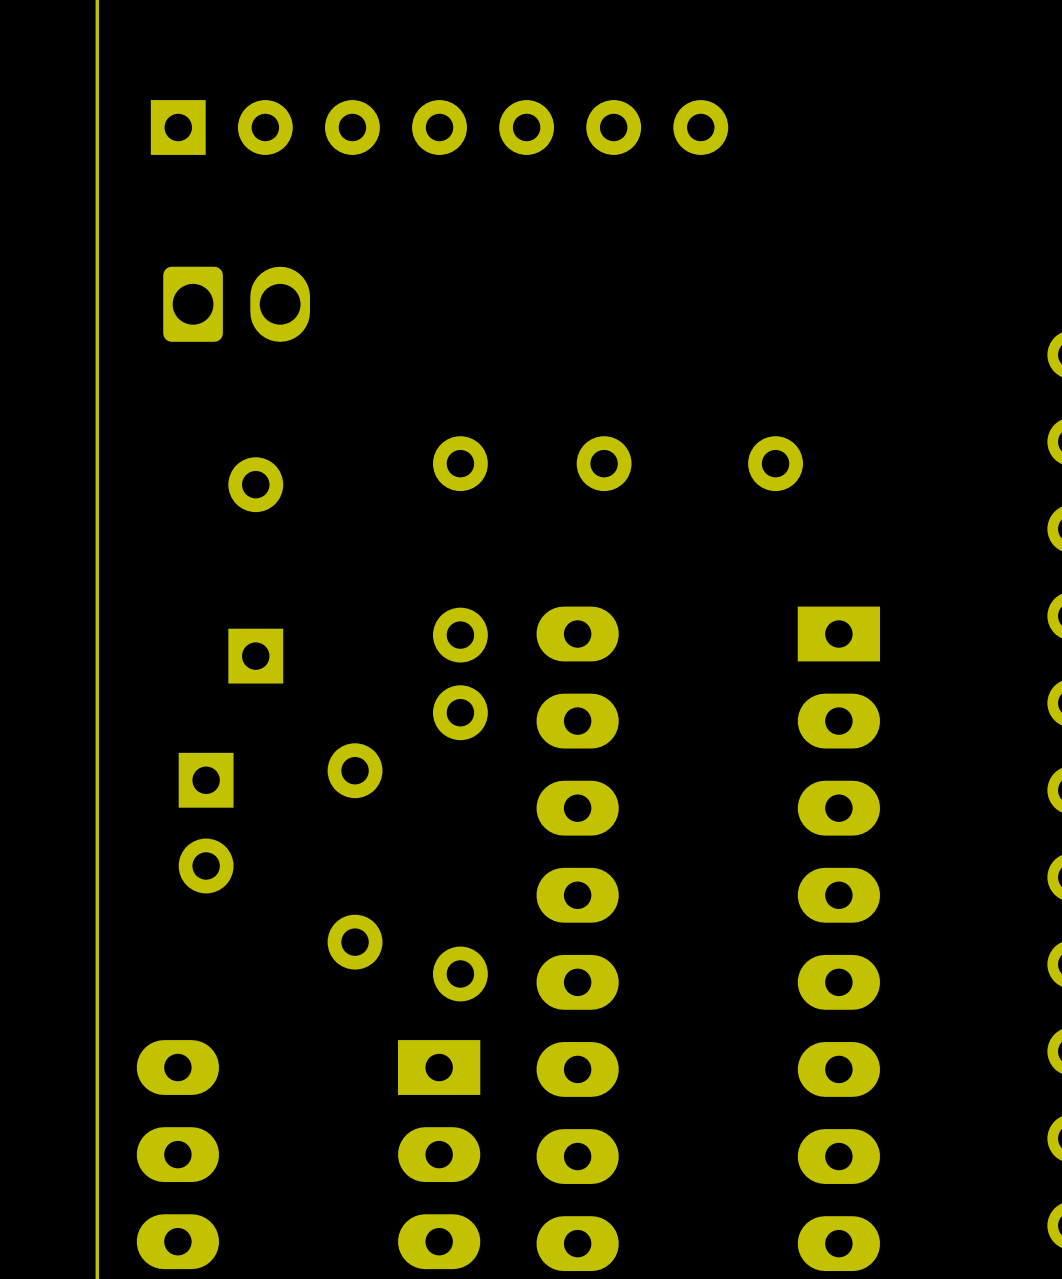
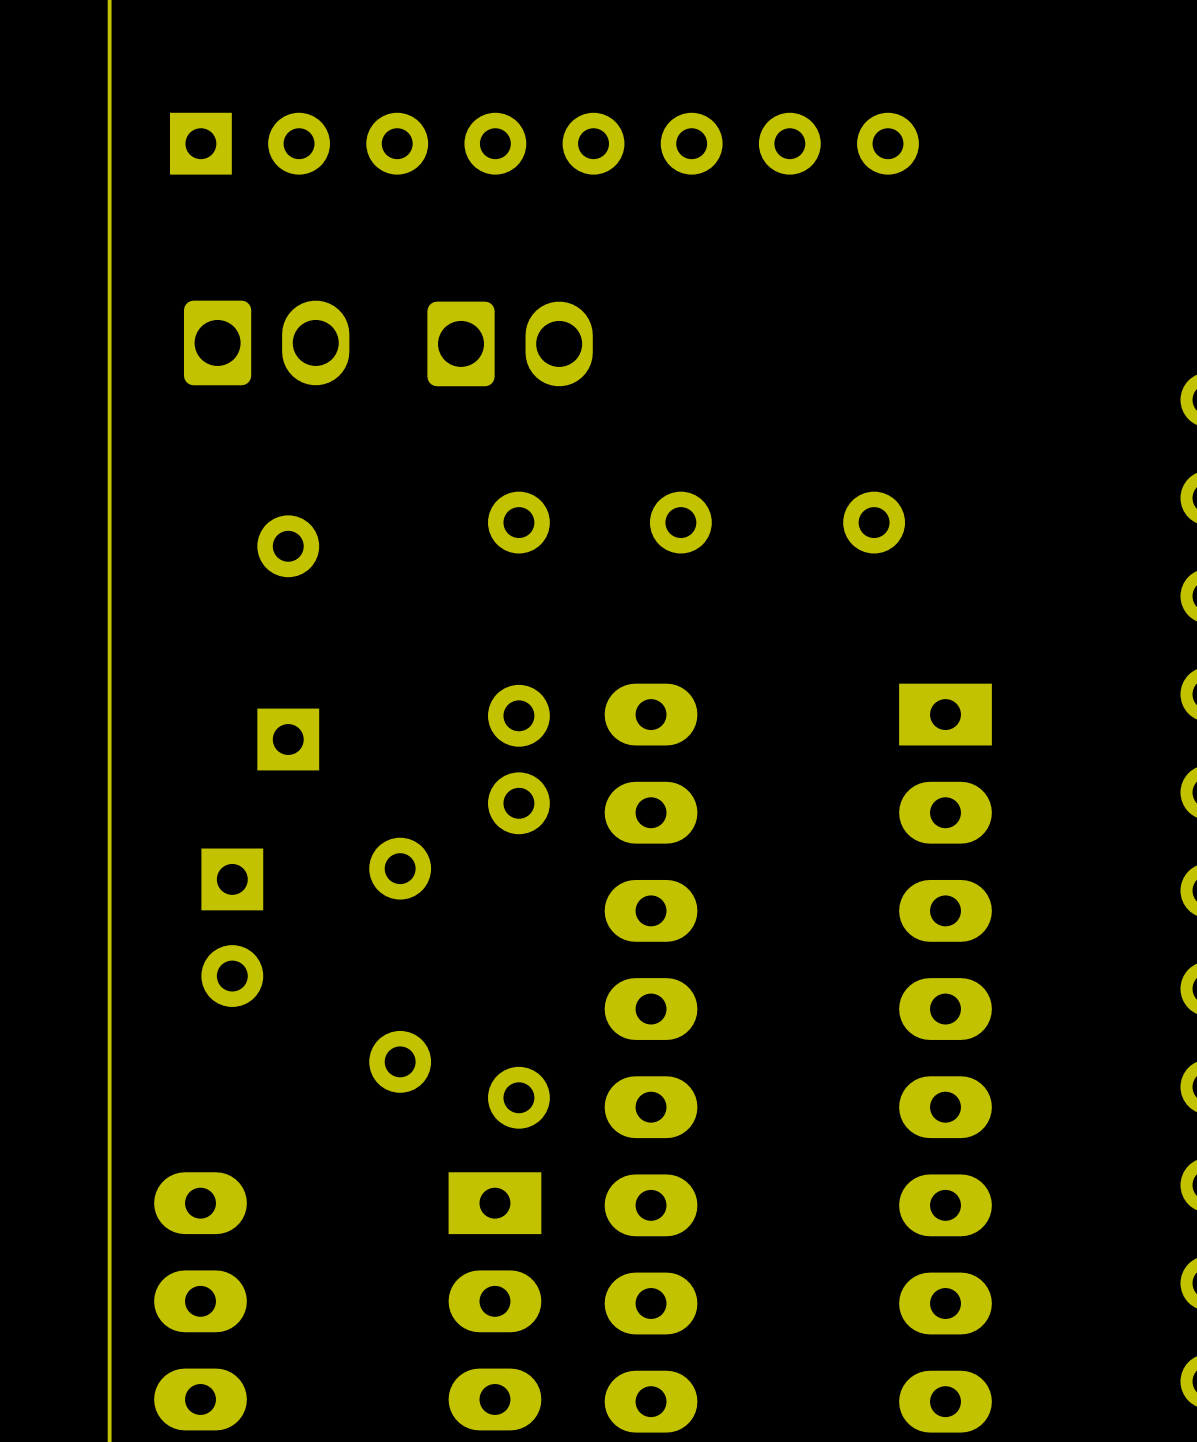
part: none -> (544, 143)
part: none -> (510, 343)

